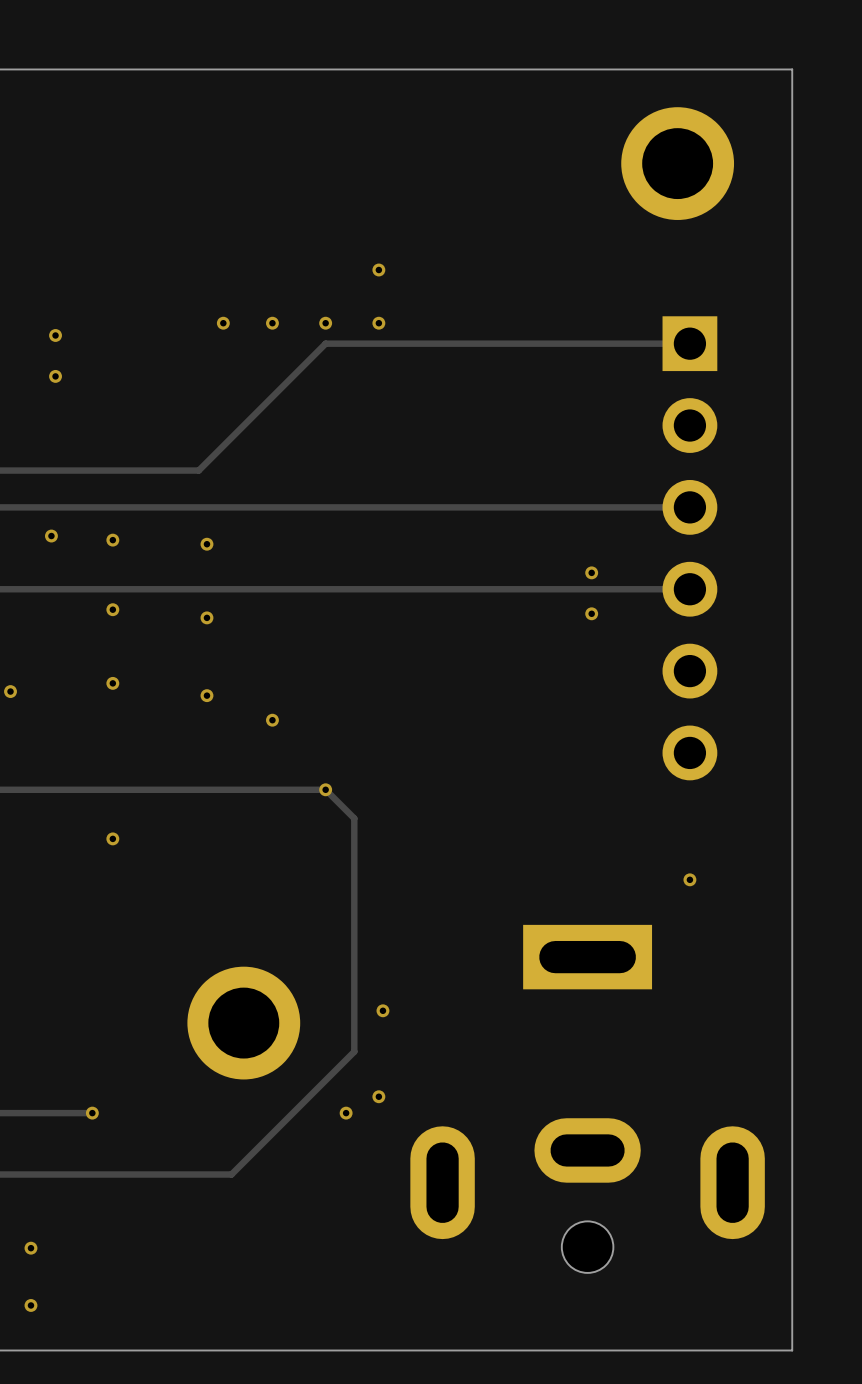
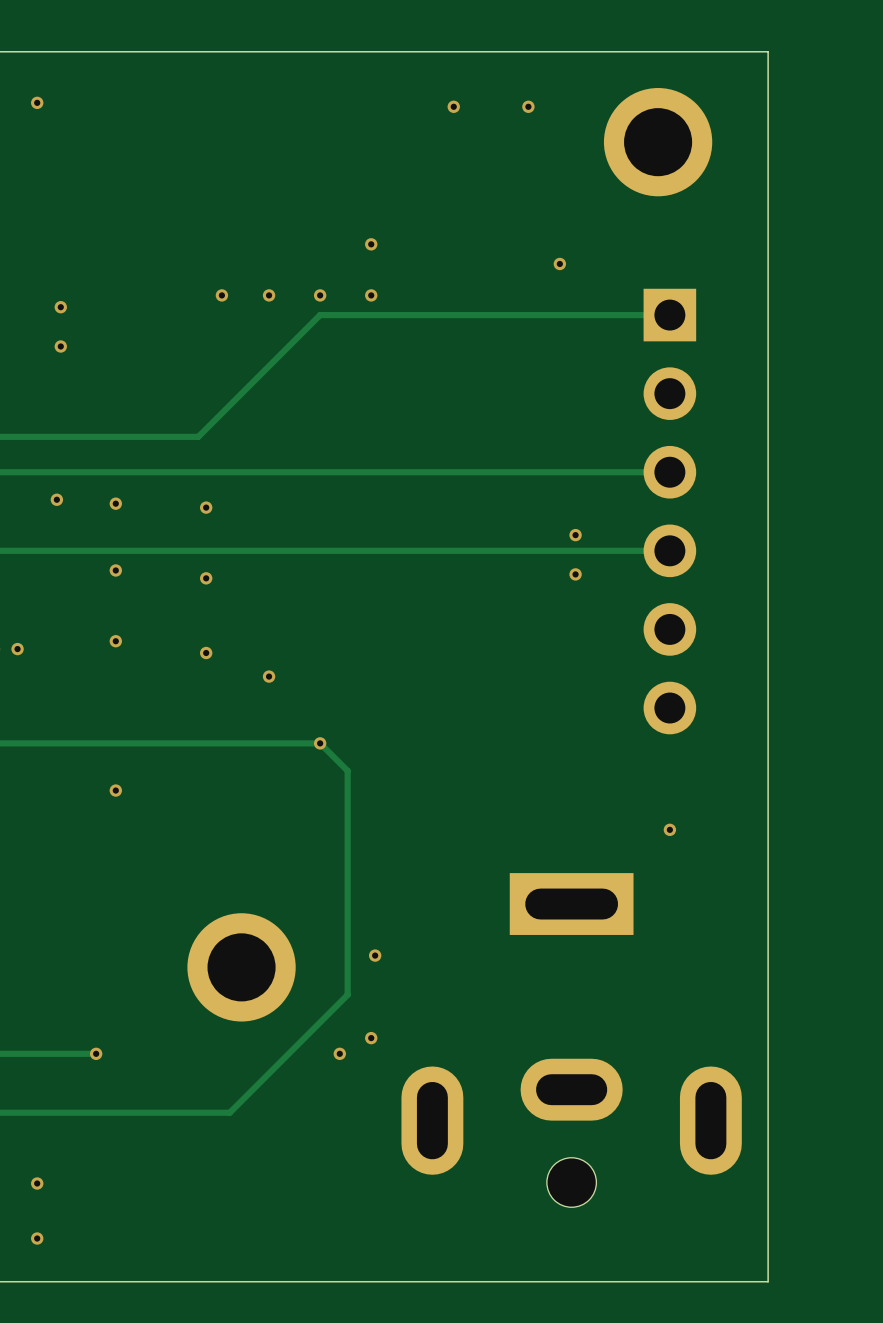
via: none -> (37, 102)
via: none -> (453, 106)
via: none -> (528, 106)
via: none -> (559, 263)

